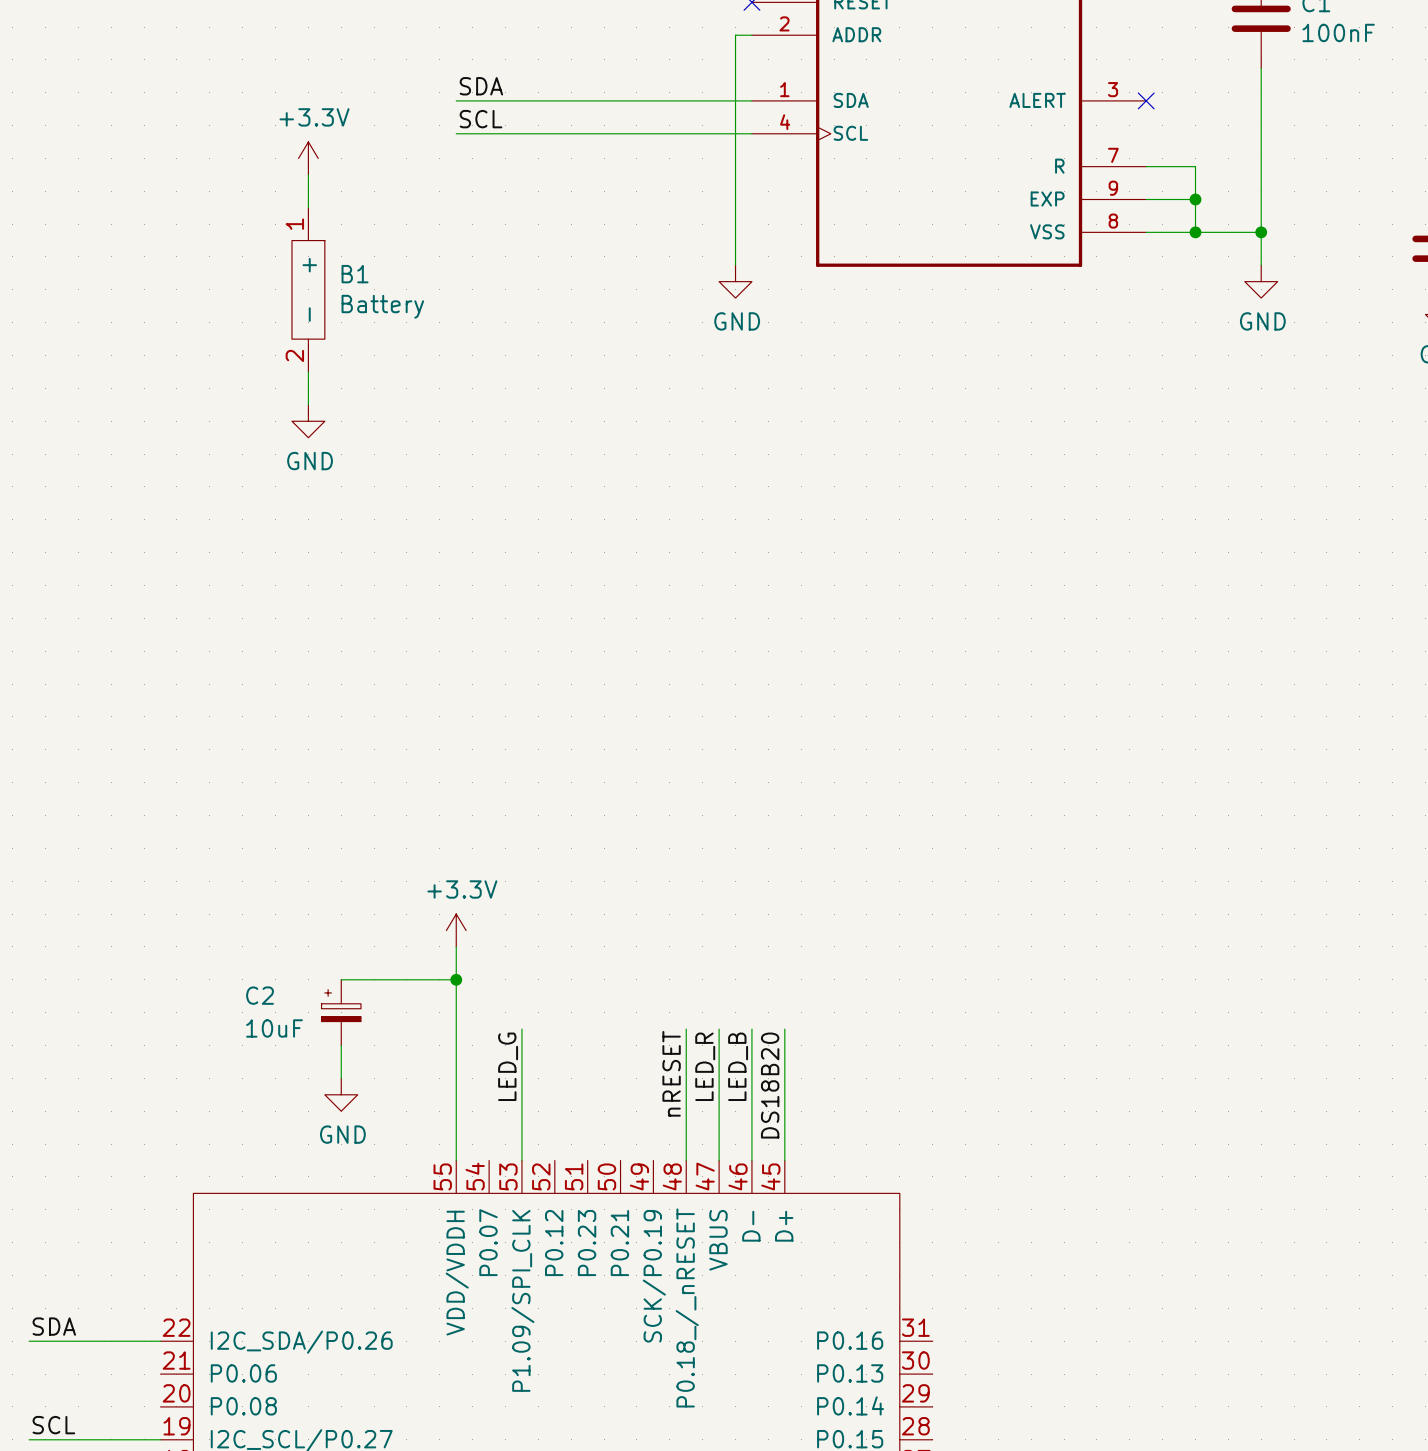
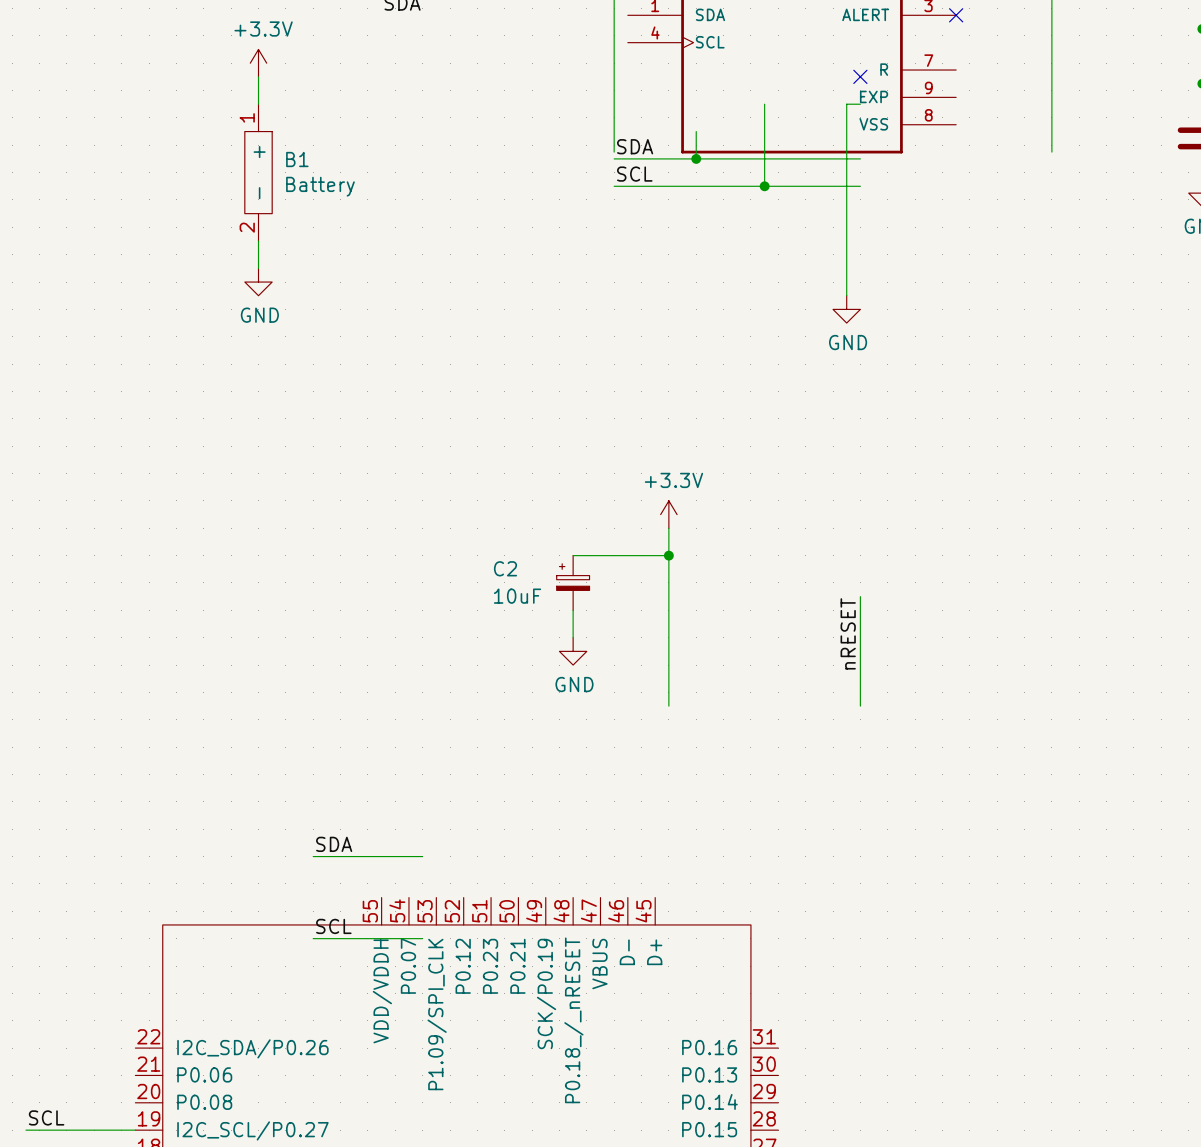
wire: (456, 100) (751, 100) -> none
label: SCL (481, 119) -> none
wire: (456, 133) (751, 133) -> (614, 158) (860, 158)
wire: (1146, 166) (1195, 166) (1195, 232) -> none
no-connect mark: none -> (860, 76)
wire: (1146, 199) (1195, 199) -> none
junction: (1195, 199) -> none
wire: none -> (764, 104) (764, 186)
wire: none -> (860, 104) (846, 104) (846, 295)
wire: (1146, 232) (1261, 232) -> none
junction: (1195, 232) -> none
junction: (1261, 232) -> none
wire: none -> (696, 131) (696, 158)
label: none -> SDA (635, 146)
junction: none -> (696, 158)
power symbol: GND (735, 281) -> none
power symbol: GND (1261, 281) -> none
label: none -> SCL (634, 174)
wire: none -> (614, 186) (860, 186)
junction: none -> (764, 186)
power symbol: none -> GND (846, 309)
power symbol: none -> +3.3V (668, 514)
wire: none -> (668, 528) (668, 706)
wire: none -> (573, 555) (668, 555)
junction: none -> (668, 555)
wire: none -> (860, 596) (860, 706)
wire: none -> (573, 610) (573, 637)
label: none -> nRESET (848, 633)
power symbol: none -> GND (573, 651)
power symbol: +3.3V (456, 930) -> none
wire: (456, 946) (456, 1160) -> none
wire: (341, 979) (456, 979) -> none
junction: (456, 979) -> none
C2 position: (341, 1012) -> (573, 582)
wire: (521, 1029) (521, 1160) -> none
wire: (686, 1029) (686, 1160) -> none
wire: (719, 1029) (719, 1160) -> none
wire: (751, 1029) (751, 1160) -> none
wire: (784, 1029) (784, 1160) -> none
wire: (341, 1045) (341, 1078) -> none
label: LED_G (508, 1066) -> none
label: LED_R (705, 1066) -> none
label: LED_B (738, 1066) -> none
label: nRESET (671, 1073) -> none
label: DS18B20 (770, 1085) -> none
power symbol: GND (341, 1094) -> none
label: none -> SDA (334, 844)
wire: none -> (313, 856) (422, 856)
label: none -> SCL (333, 926)
wire: none -> (313, 938) (422, 938)
label: SDA (54, 1326) -> none
wire: (29, 1341) (160, 1341) -> none

